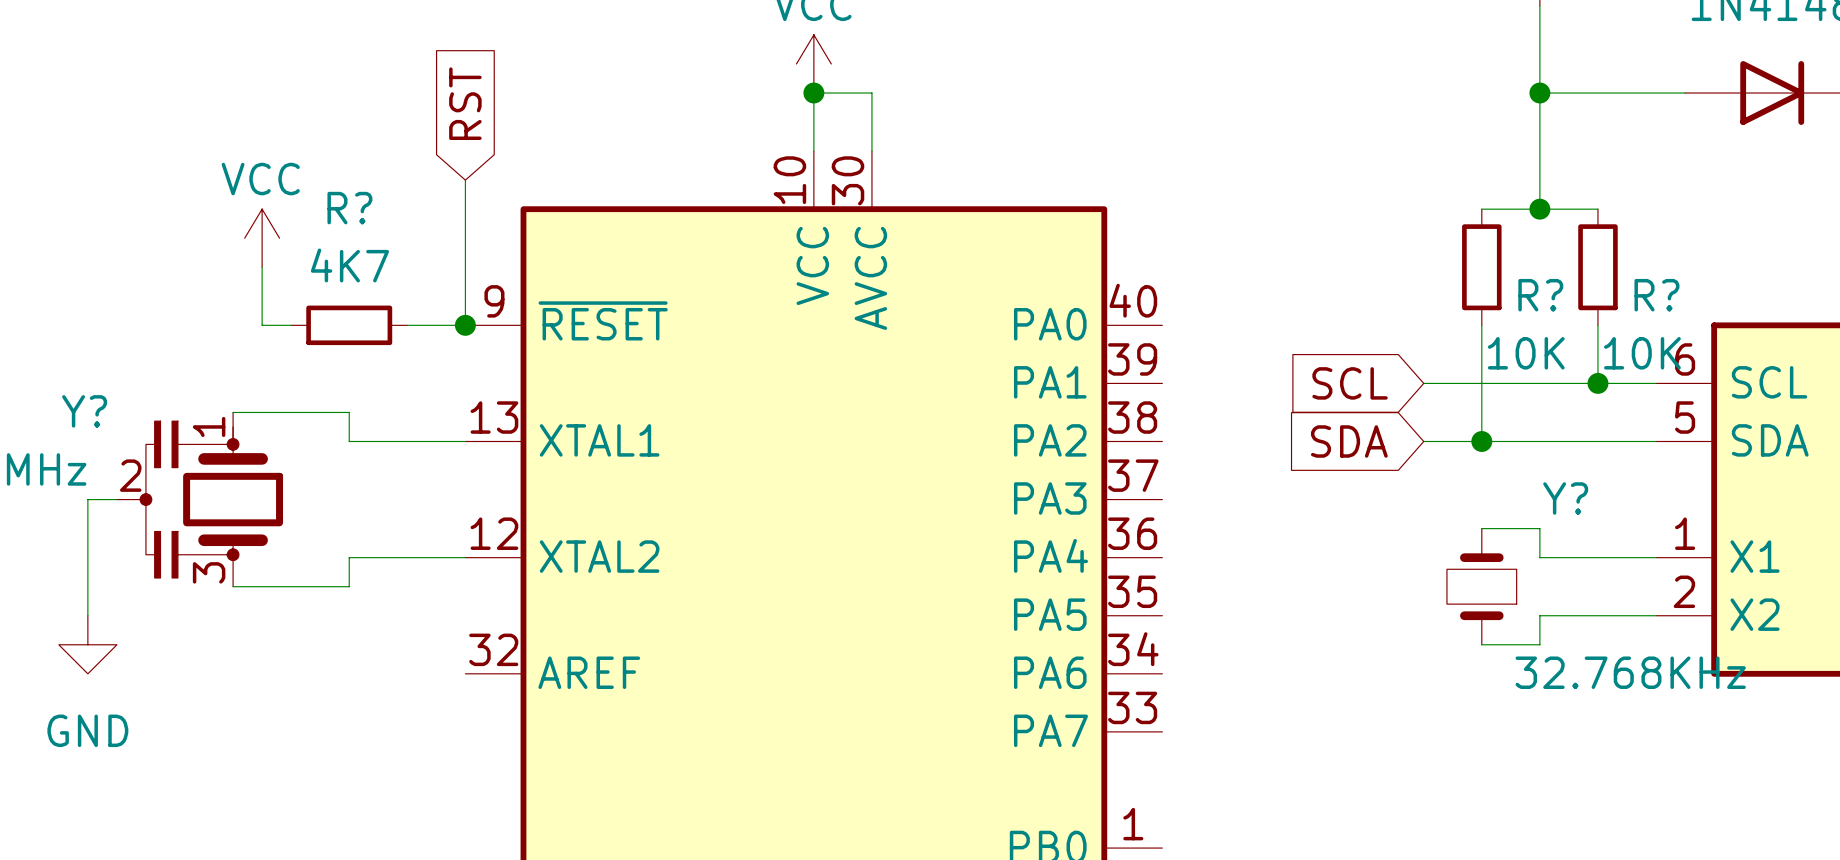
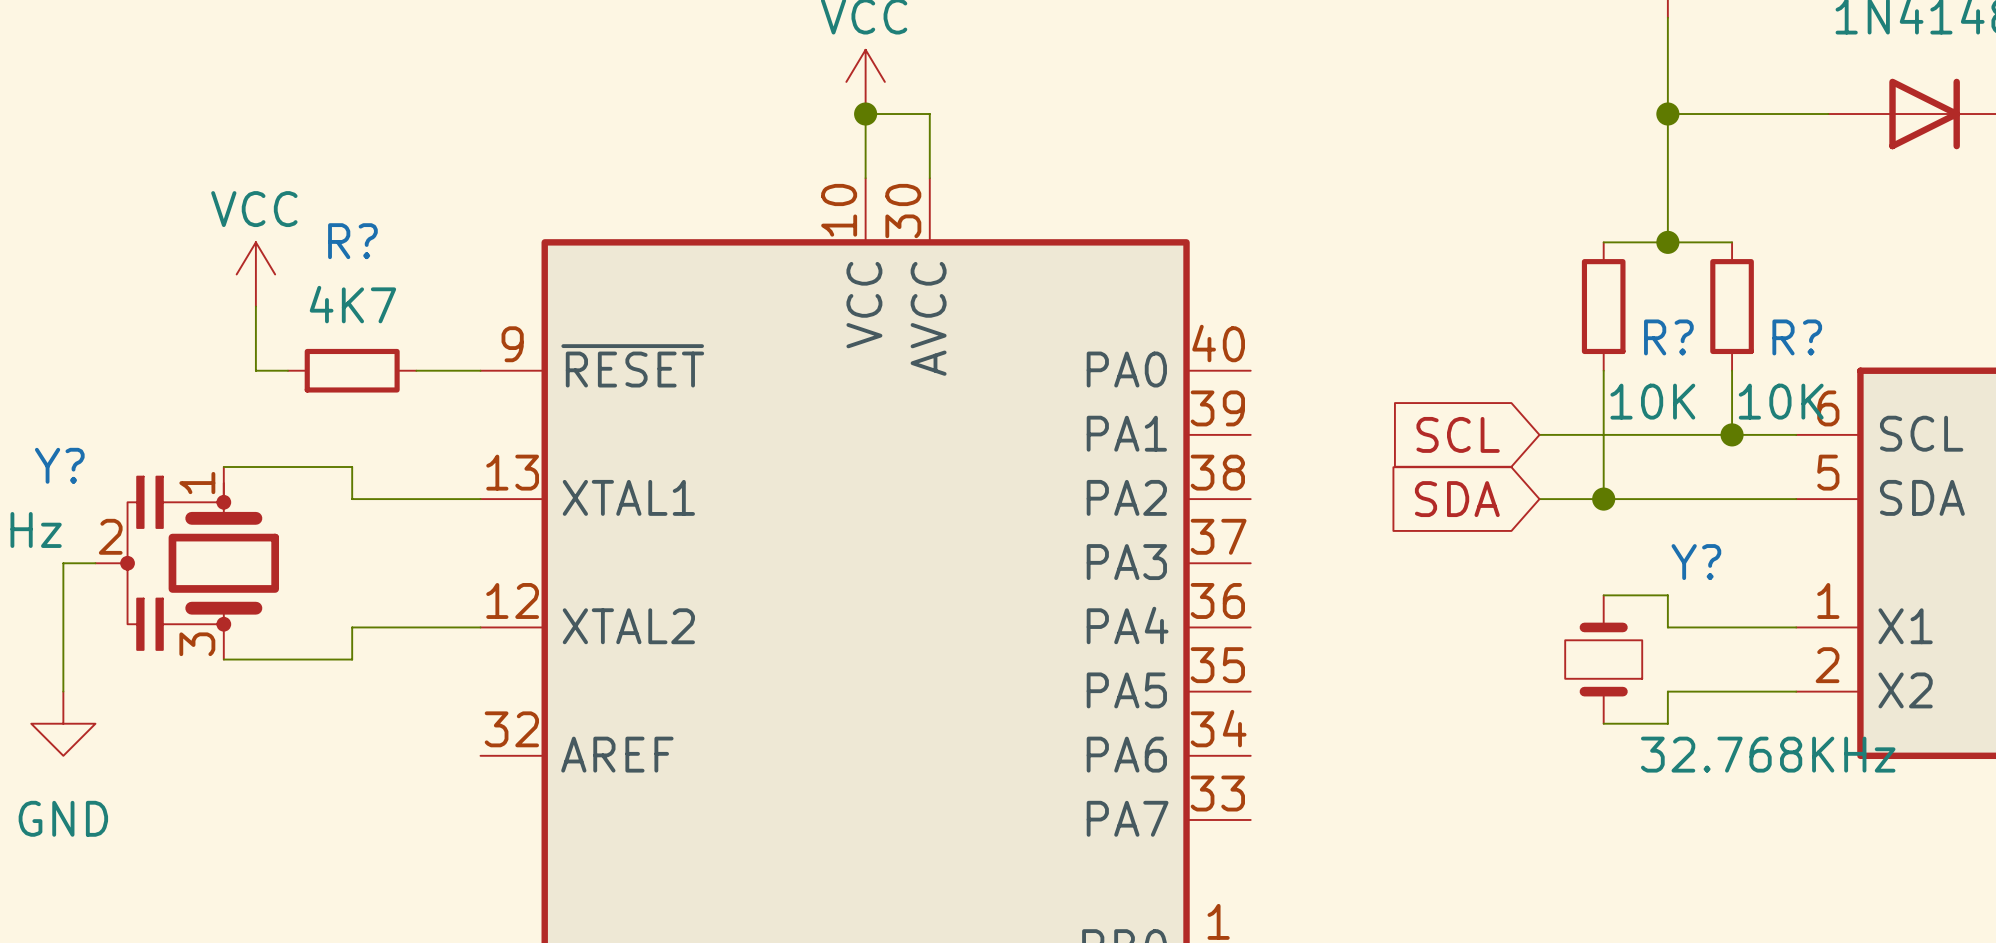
global label: RST (465, 103) -> none
wire: (465, 180) (465, 325) -> none
junction: (465, 325) -> none

